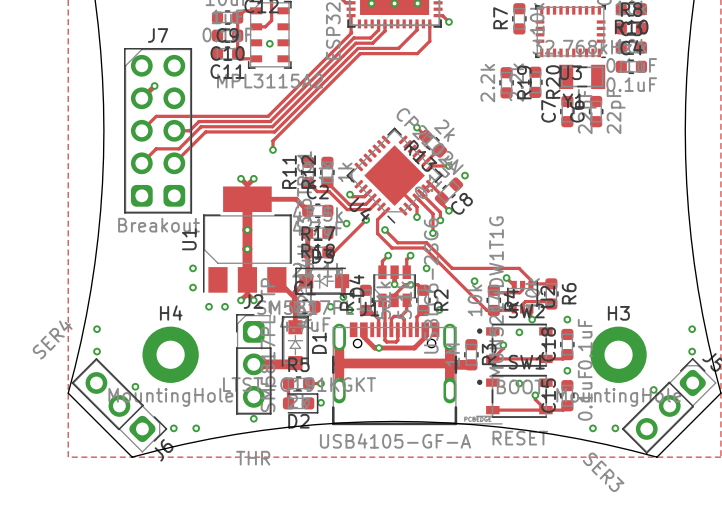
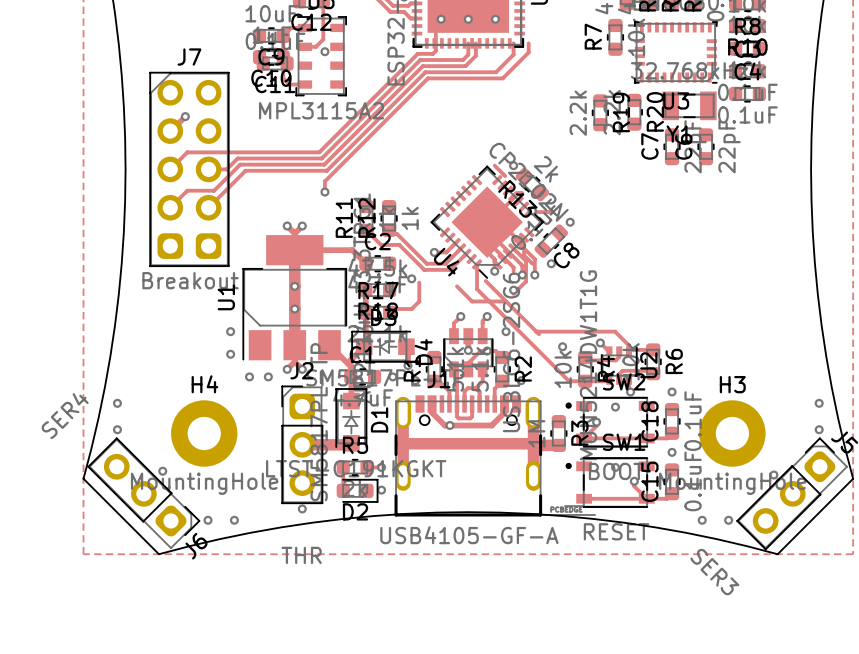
track: (351, 15) (351, 33) -> (435, 33) (435, 50) (432, 53) (417, 54)
track: (438, 15) (442, 15) (448, 22) -> none
via: (448, 22) -> none
track: (378, 23) (378, 30) (370, 38) -> (468, 43) (468, 54) (463, 60) (440, 60)
track: (384, 23) (384, 31) (372, 43) -> (475, 43) (475, 55) (465, 66) (442, 66)
track: (416, 23) (416, 30) (398, 48) -> (513, 43) (513, 54) (496, 72) (473, 72)
track: (429, 23) (429, 41) (417, 53) -> (528, 43) (528, 52) (502, 78) (495, 78)
via position: (269, 43) -> (324, 51)
C11 position: (227, 53) -> (275, 63)
via position: (416, 127) -> (513, 165)
R13 position: (432, 143) -> (532, 184)
track: (448, 165) (430, 166) -> none
track: none -> (551, 210) (529, 212)
U4 position: (394, 175) -> (487, 222)
via position: (464, 175) -> (570, 222)
track: (327, 182) (349, 204) (365, 204) (372, 197) -> none
track: none -> (392, 234) (397, 234) (426, 263) (445, 263) (461, 248)
track: (317, 191) (329, 191) (347, 209) (369, 209) (376, 202) -> (377, 241) (381, 244) (399, 244) (424, 269) (450, 269) (466, 253)
C8 position: (448, 191) -> (551, 241)
track: (367, 193) (364, 196) (352, 196) (350, 194) -> none
track: none -> (455, 243) (446, 252) (434, 252)
track: none -> (518, 243) (534, 259) (534, 275)
via: (350, 194) -> none
track: none -> (513, 248) (526, 261) (526, 281) (513, 293)
via: none -> (434, 252)
via: (448, 210) -> none
via: none -> (551, 263)
track: (385, 211) (377, 219) (377, 233) (392, 247) (424, 247) (486, 310) -> (477, 264) (477, 289) (569, 381) (577, 381)
track: (432, 217) (432, 233) -> none
track: (366, 219) (333, 252) (327, 252) -> none
via: (366, 219) -> none
via: none -> (534, 275)
track: none -> (419, 282) (419, 301) (411, 309) (389, 309)
via: (384, 229) -> none

